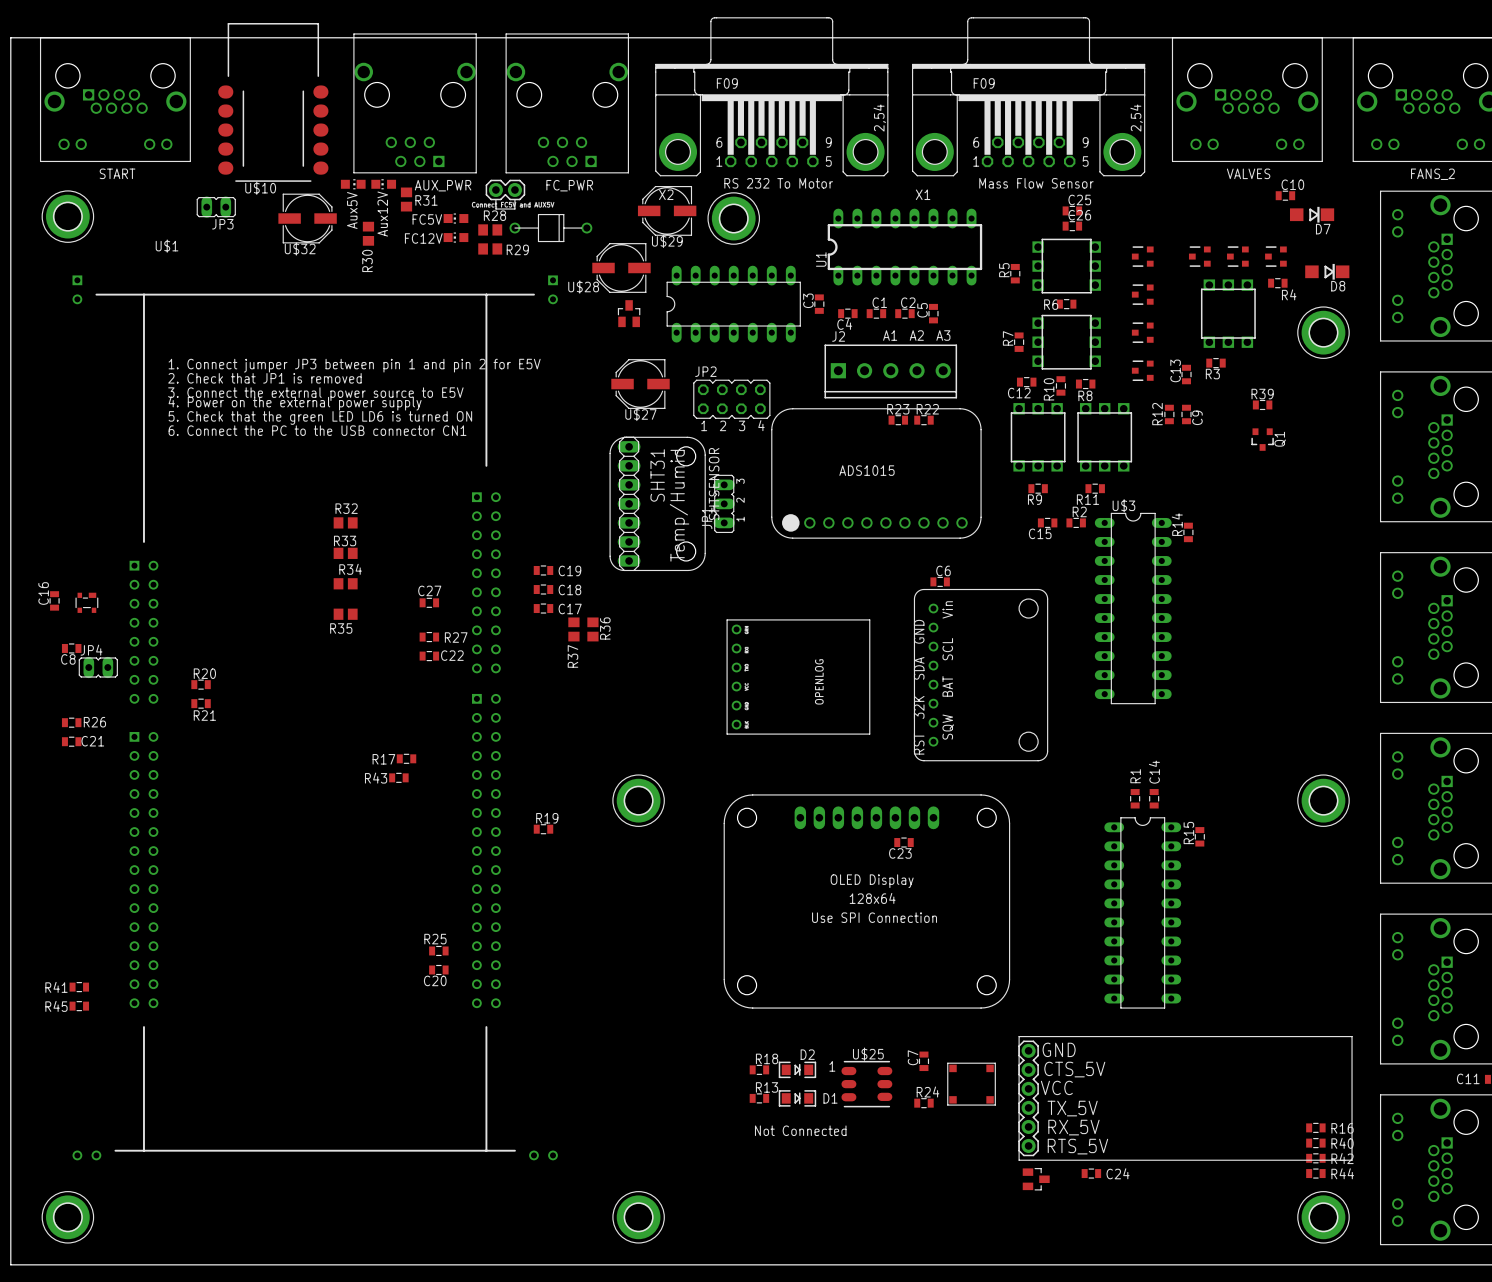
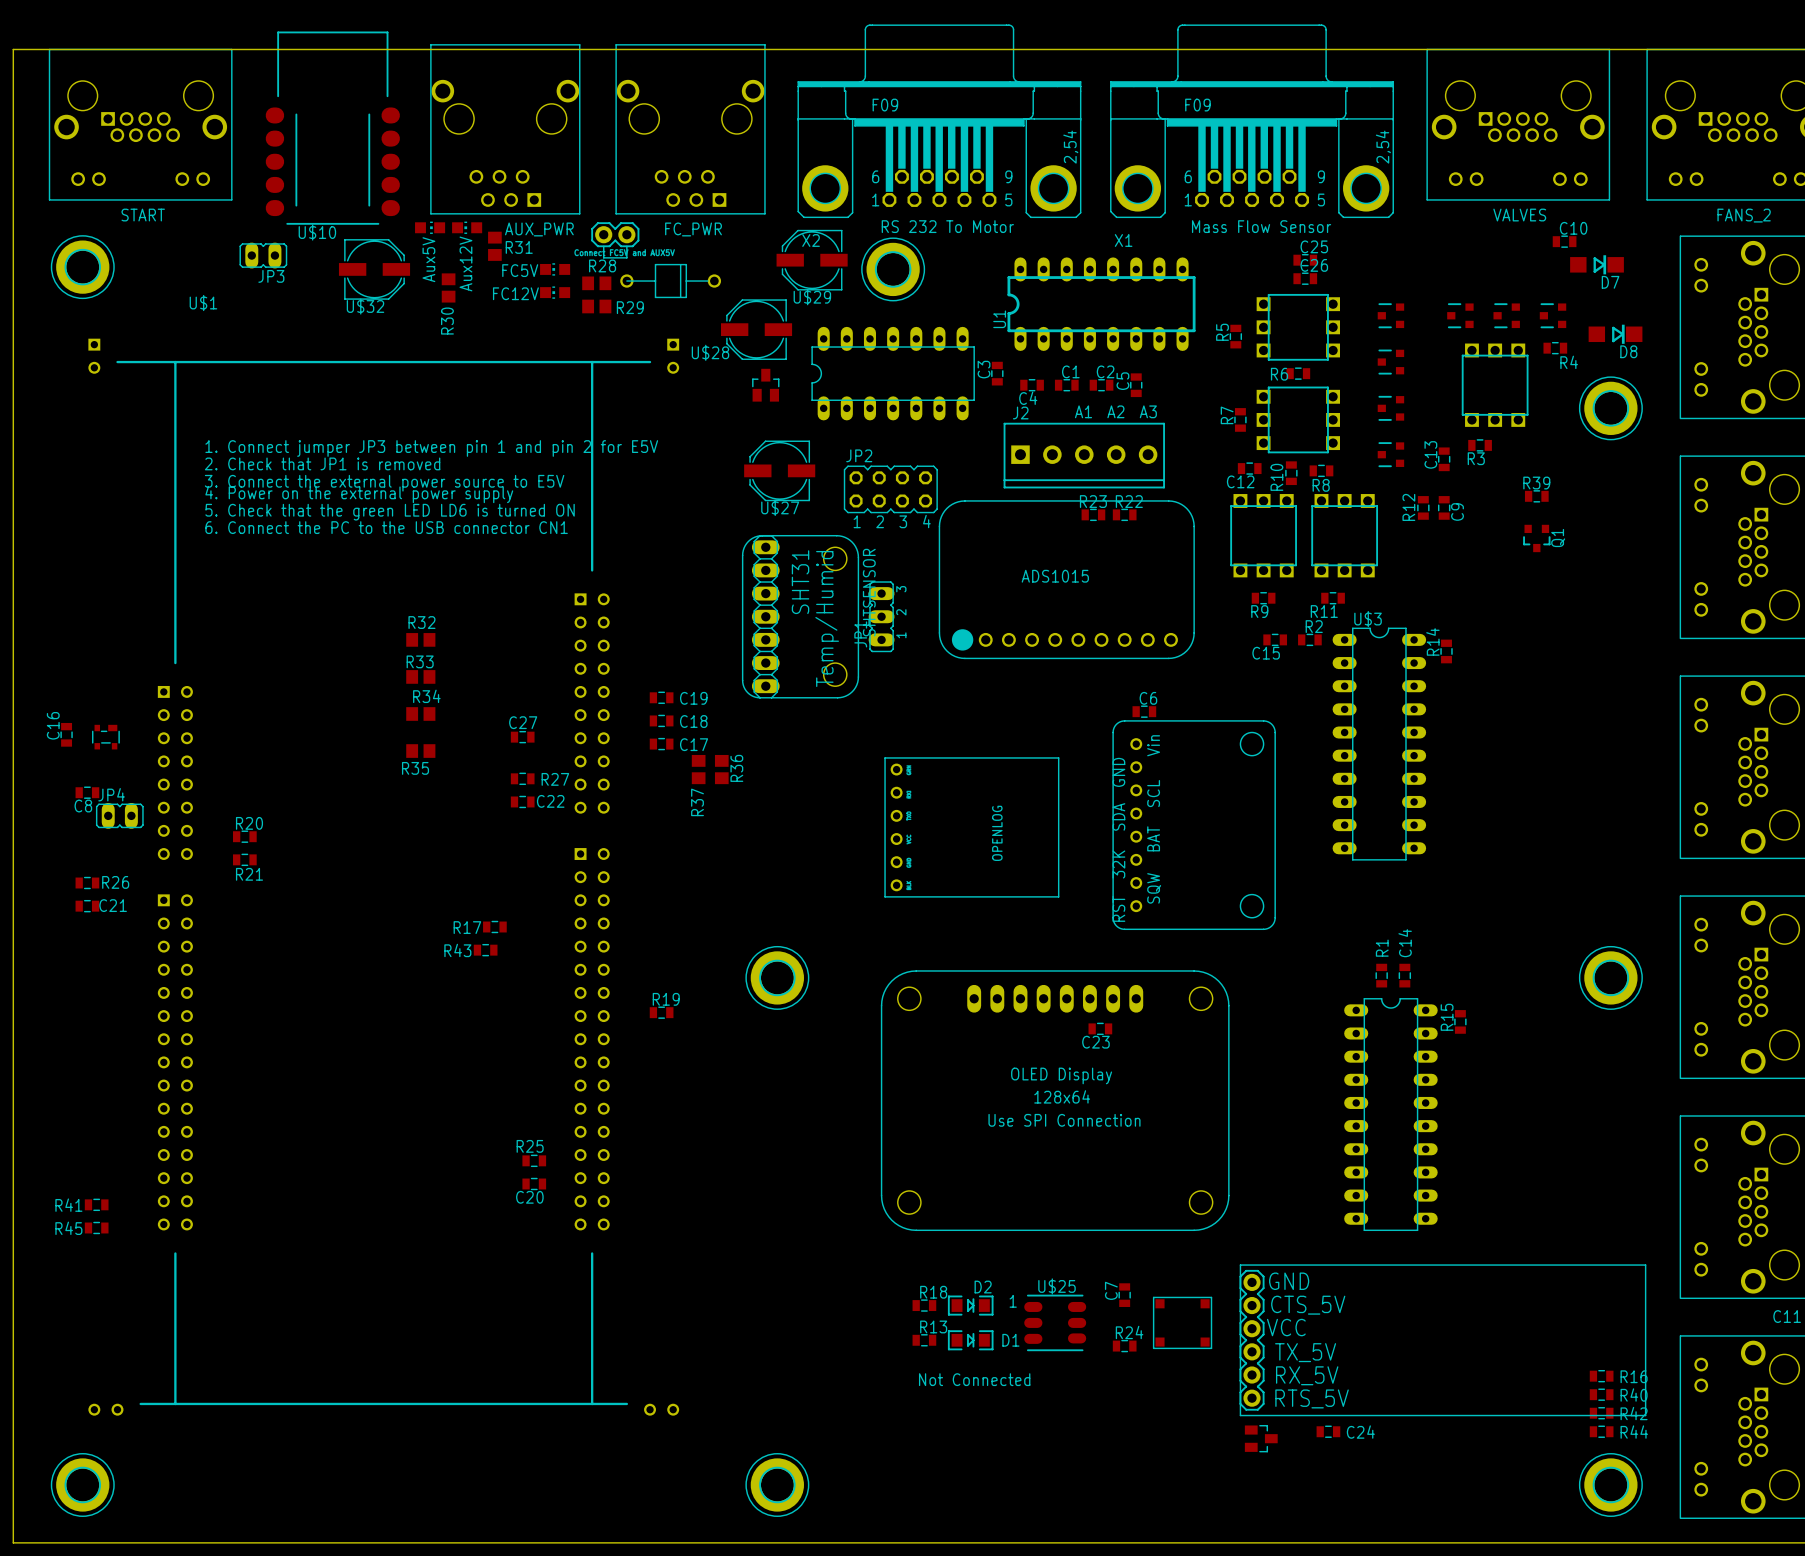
U$1 footprint: [72, 275, 558, 1161] -> [88, 338, 680, 1416]

